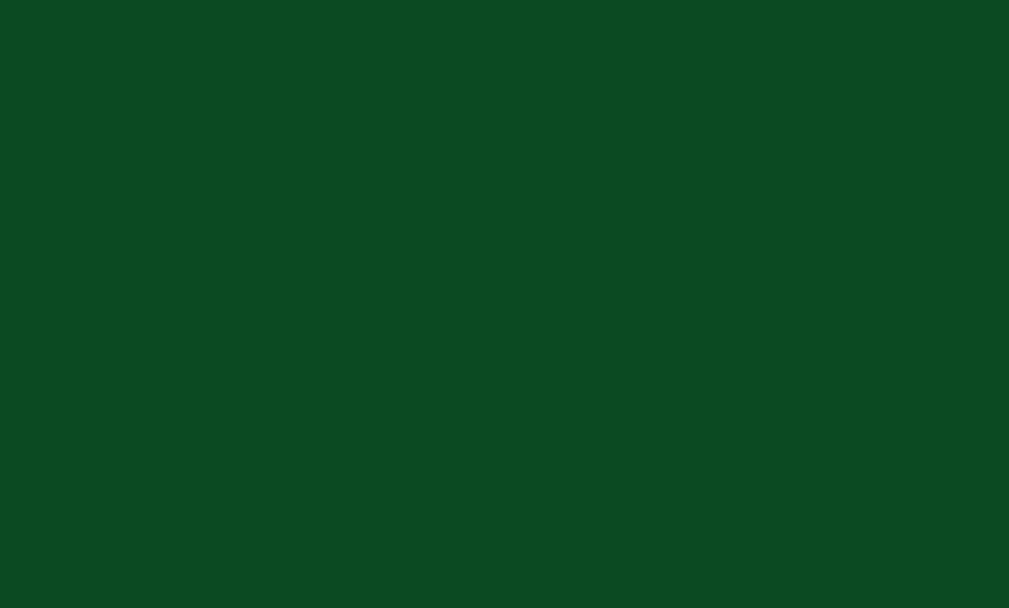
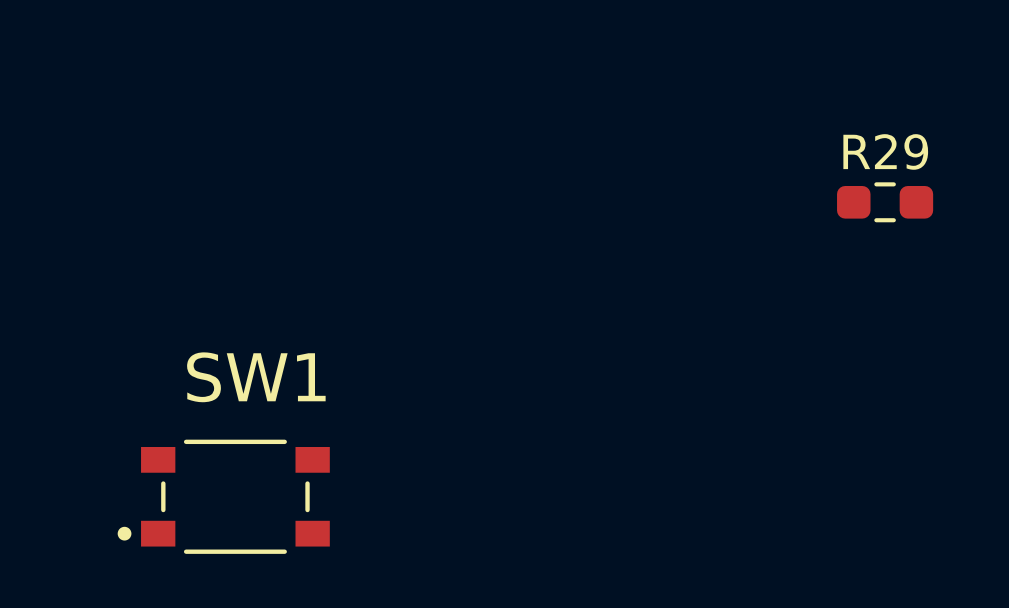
R29: none -> (885, 202)
SW1: none -> (223, 496)

